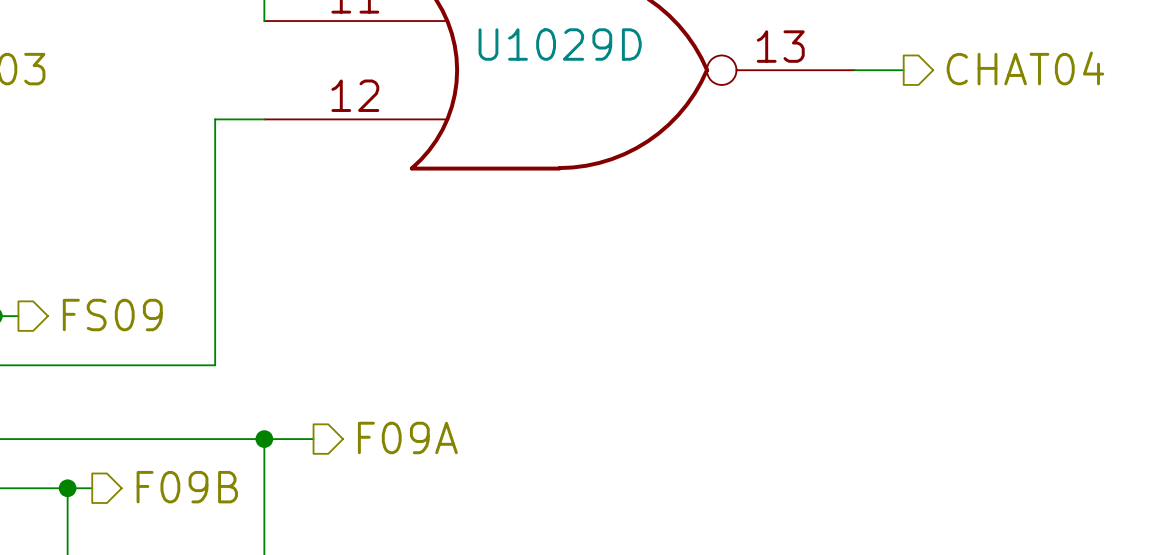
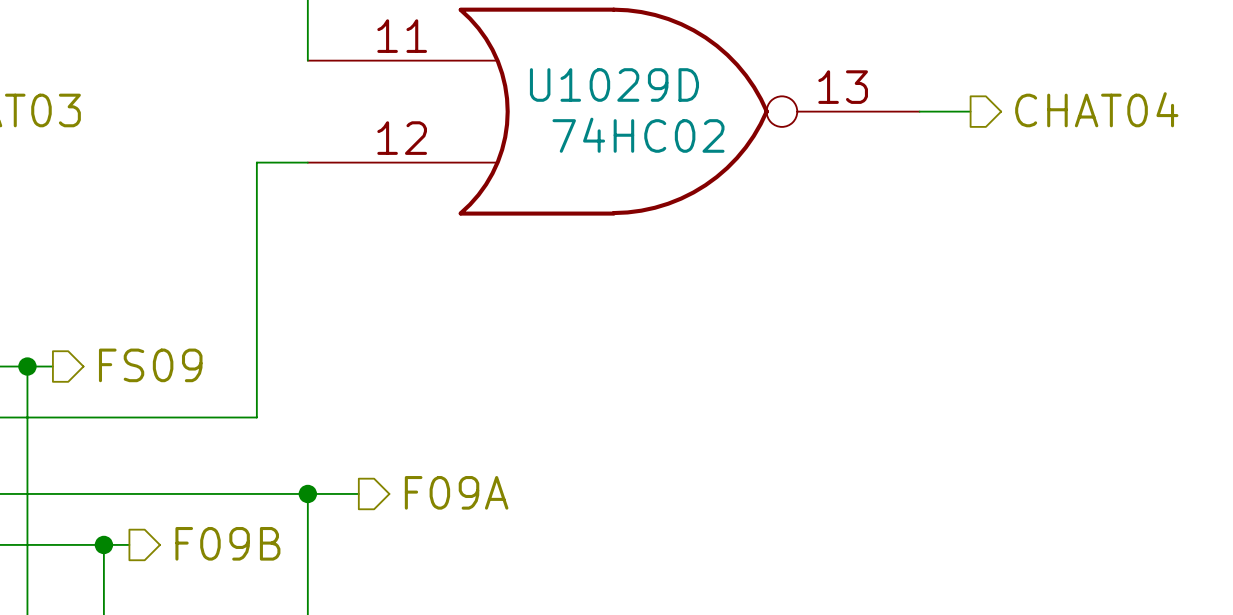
U1029D value: none -> 74HC02 (638, 135)

